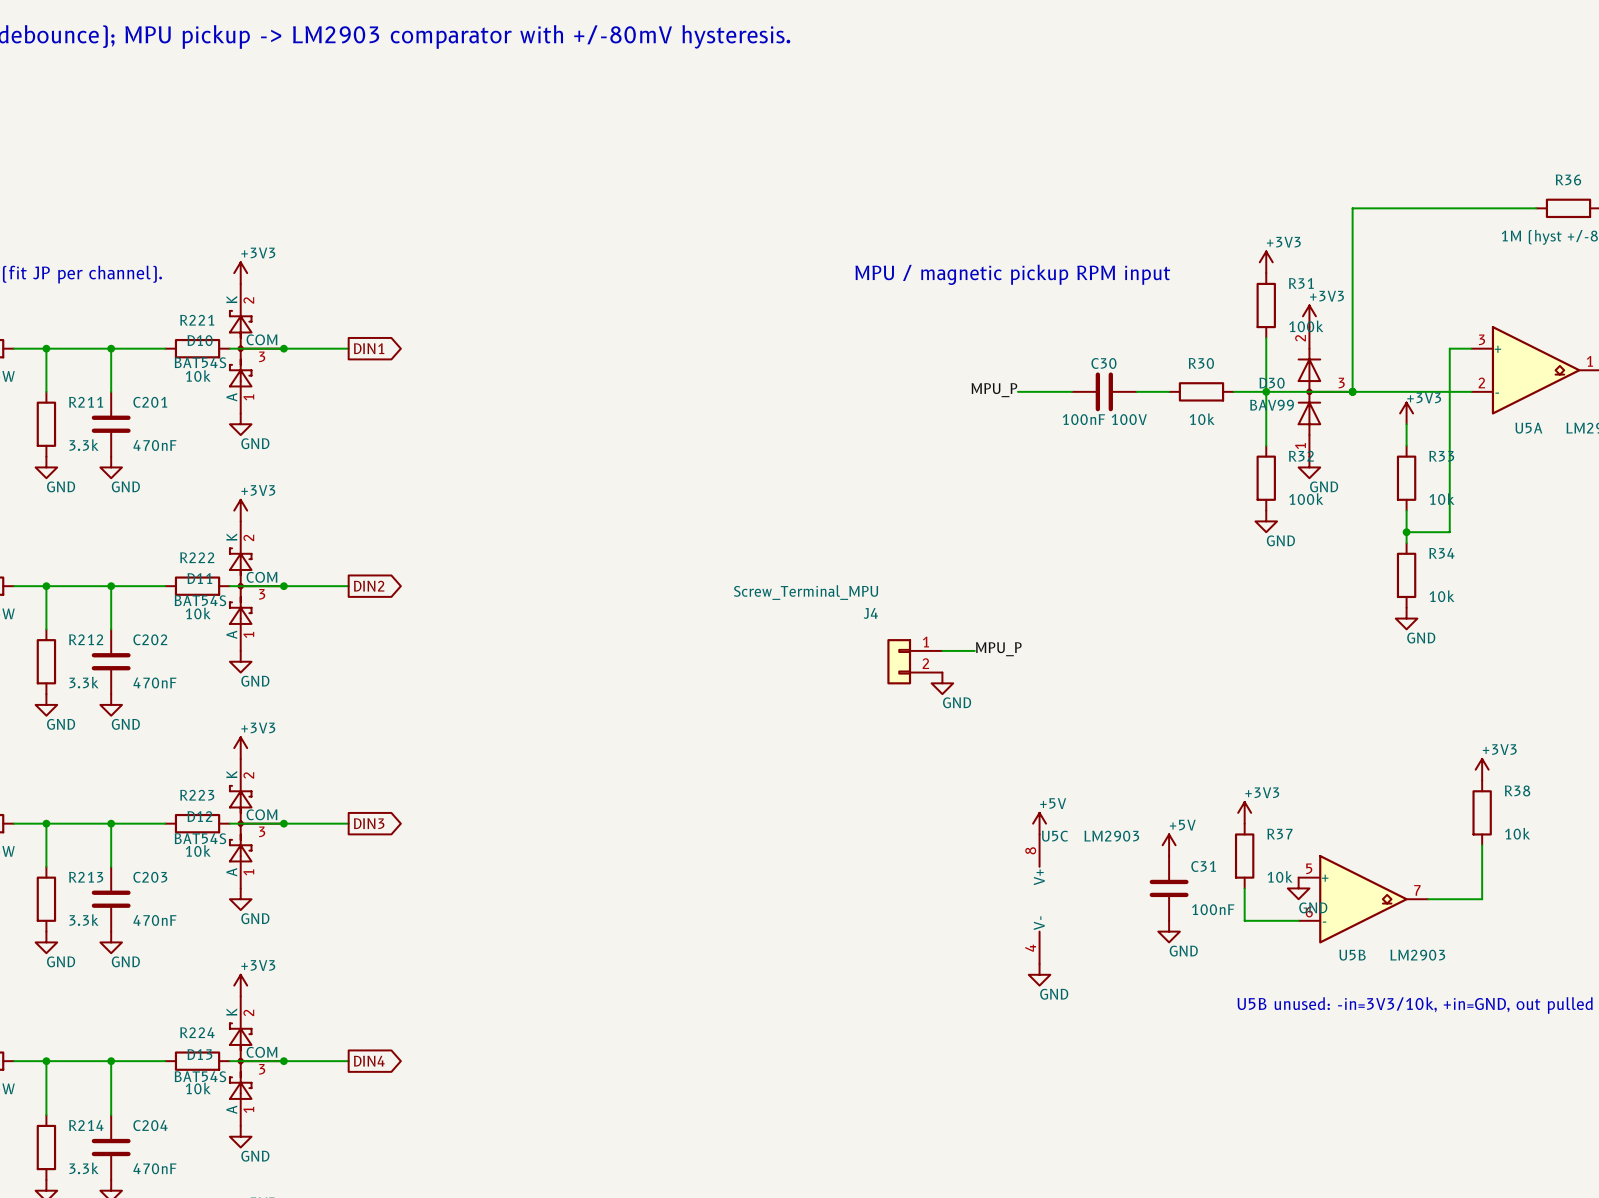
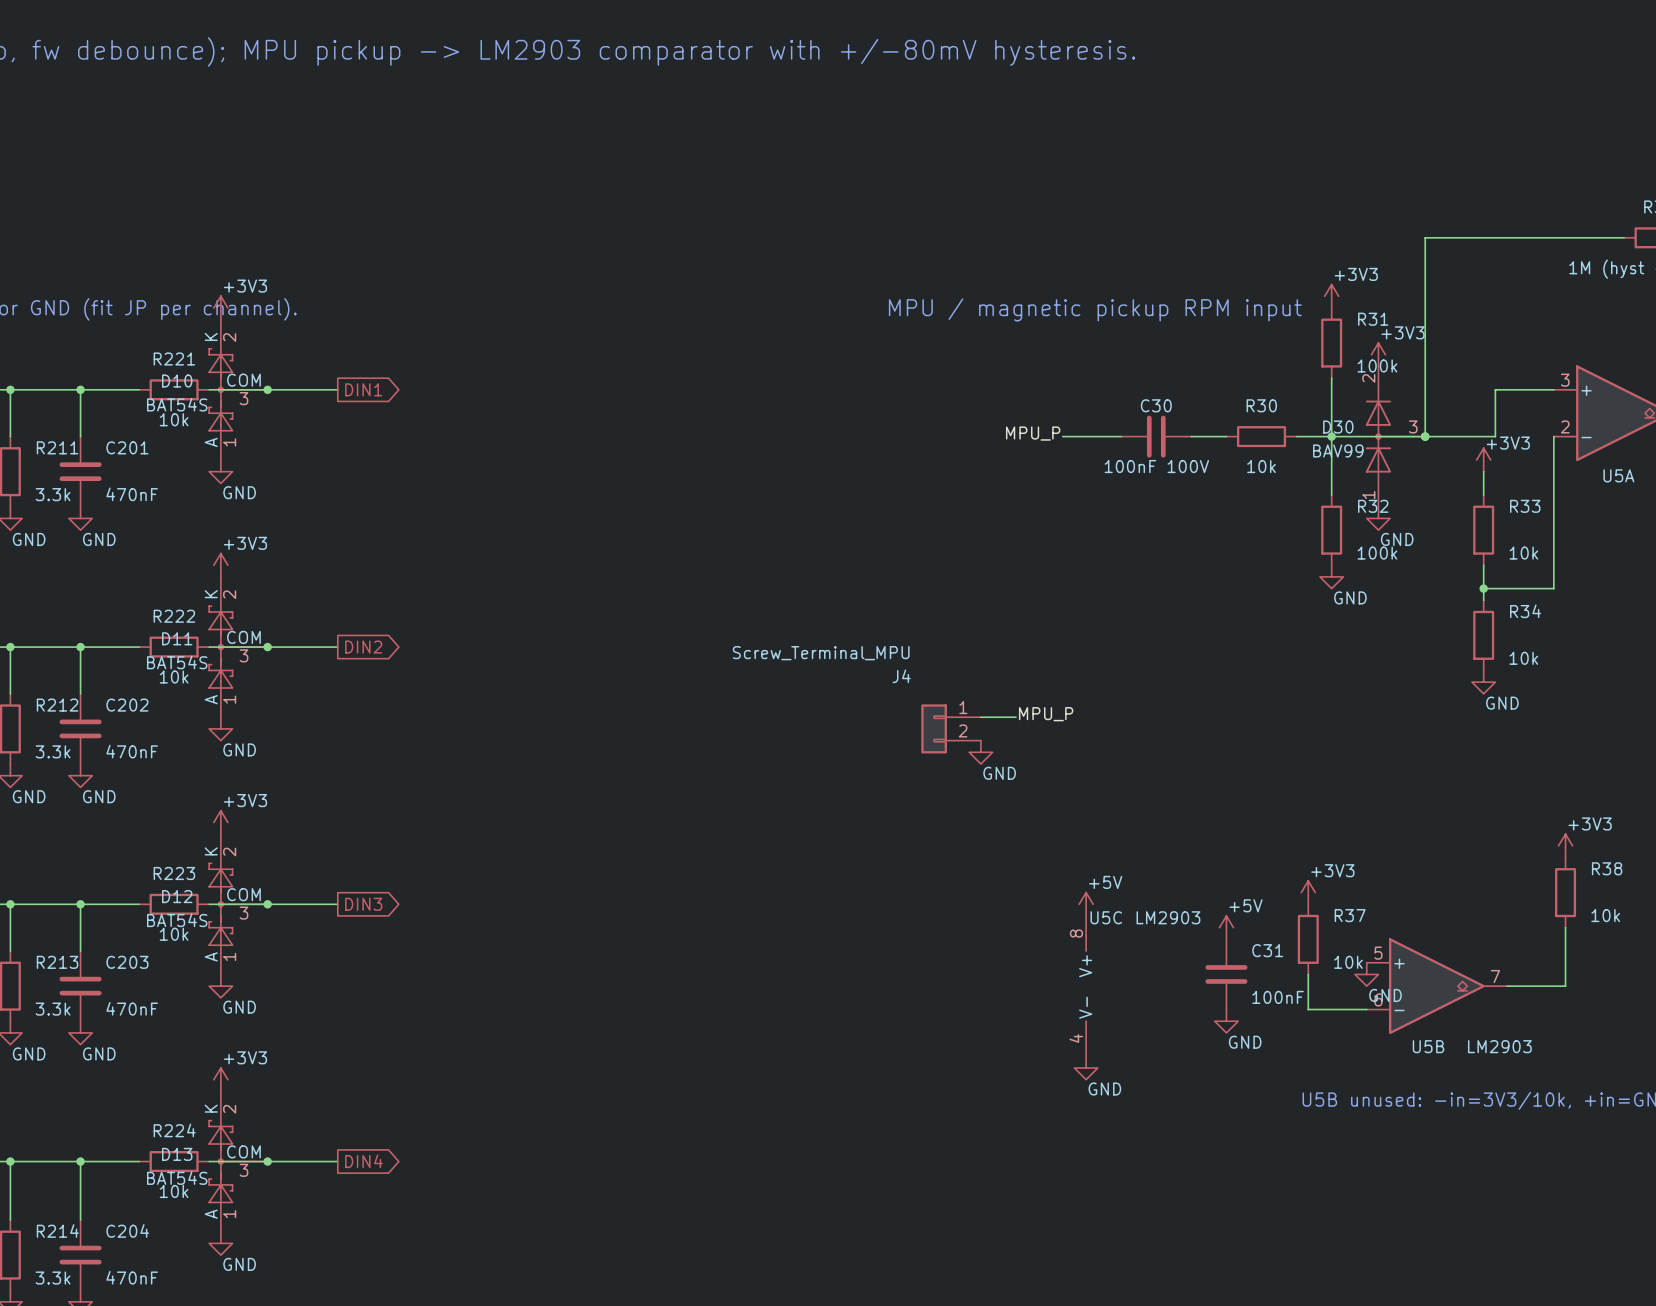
wire: (1449, 348) (1449, 532) -> (1553, 436) (1553, 588) (1530, 588)
wire: (1417, 391) (1471, 391) -> (1495, 436) (1495, 389) (1530, 389)

